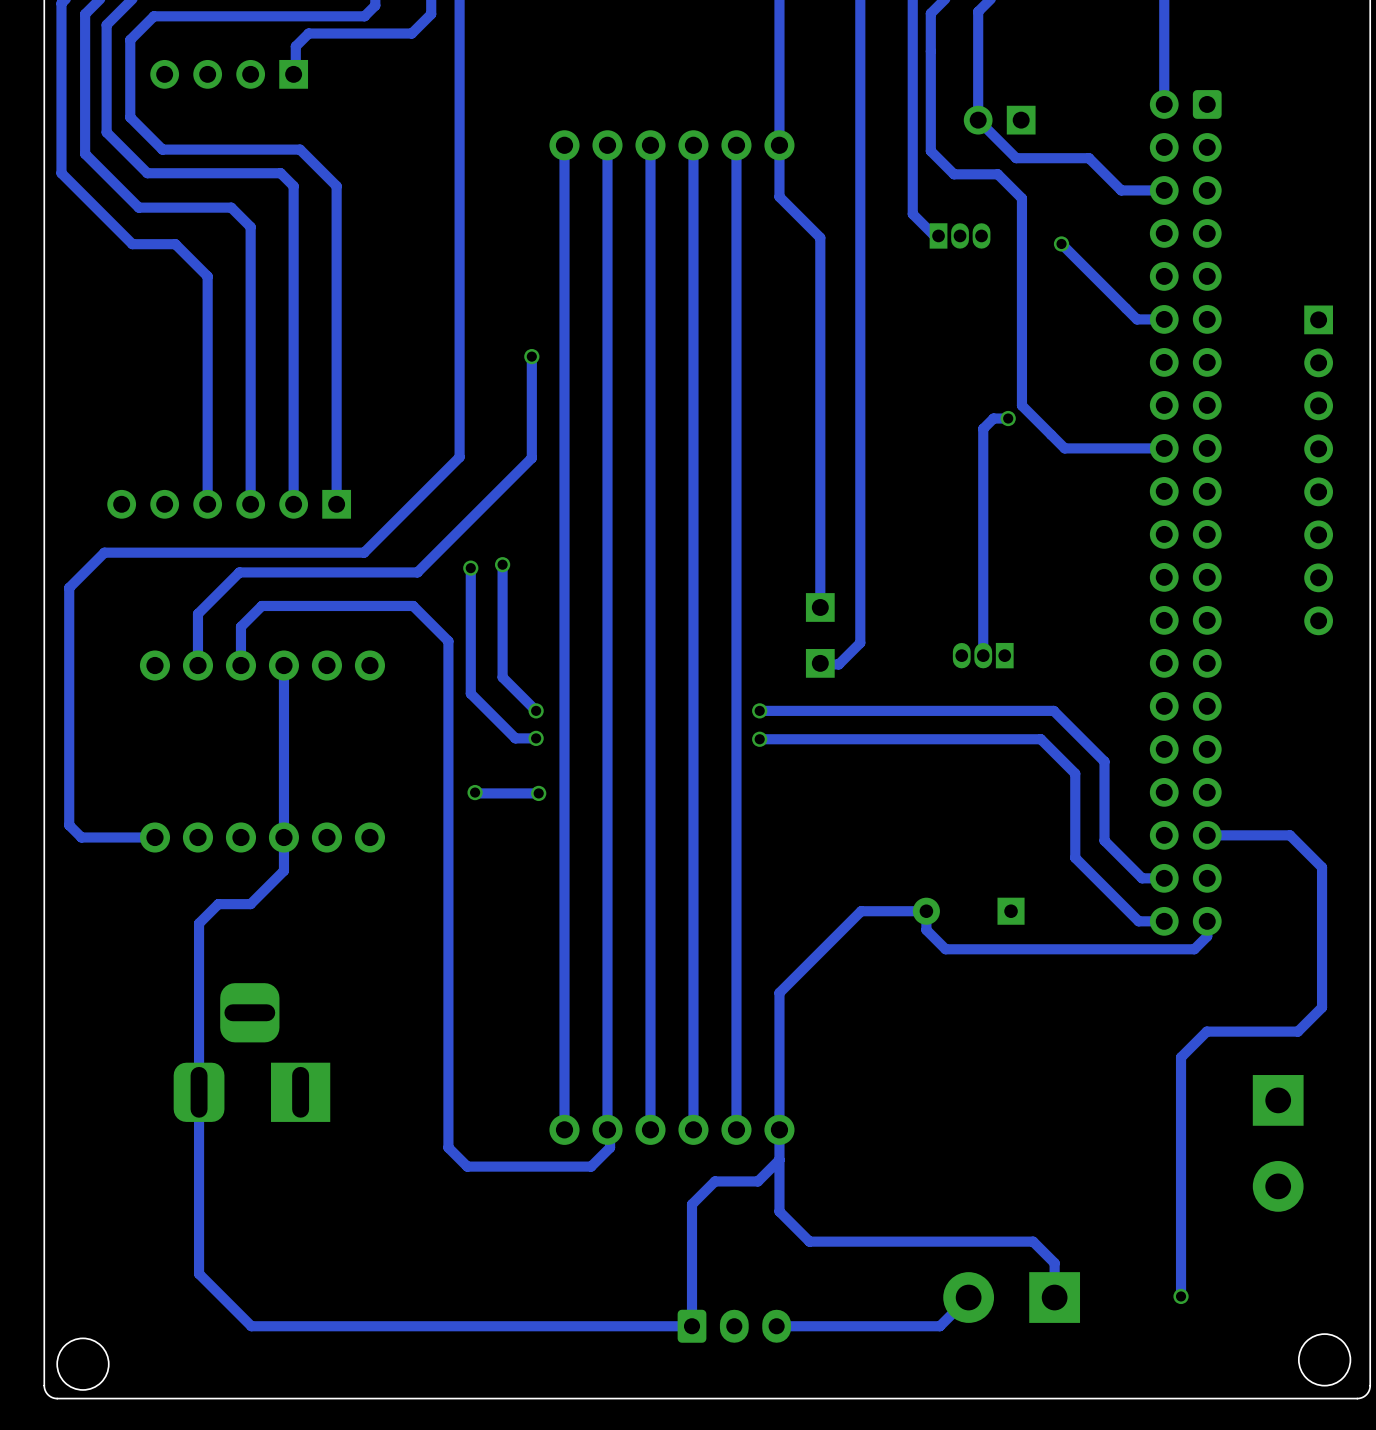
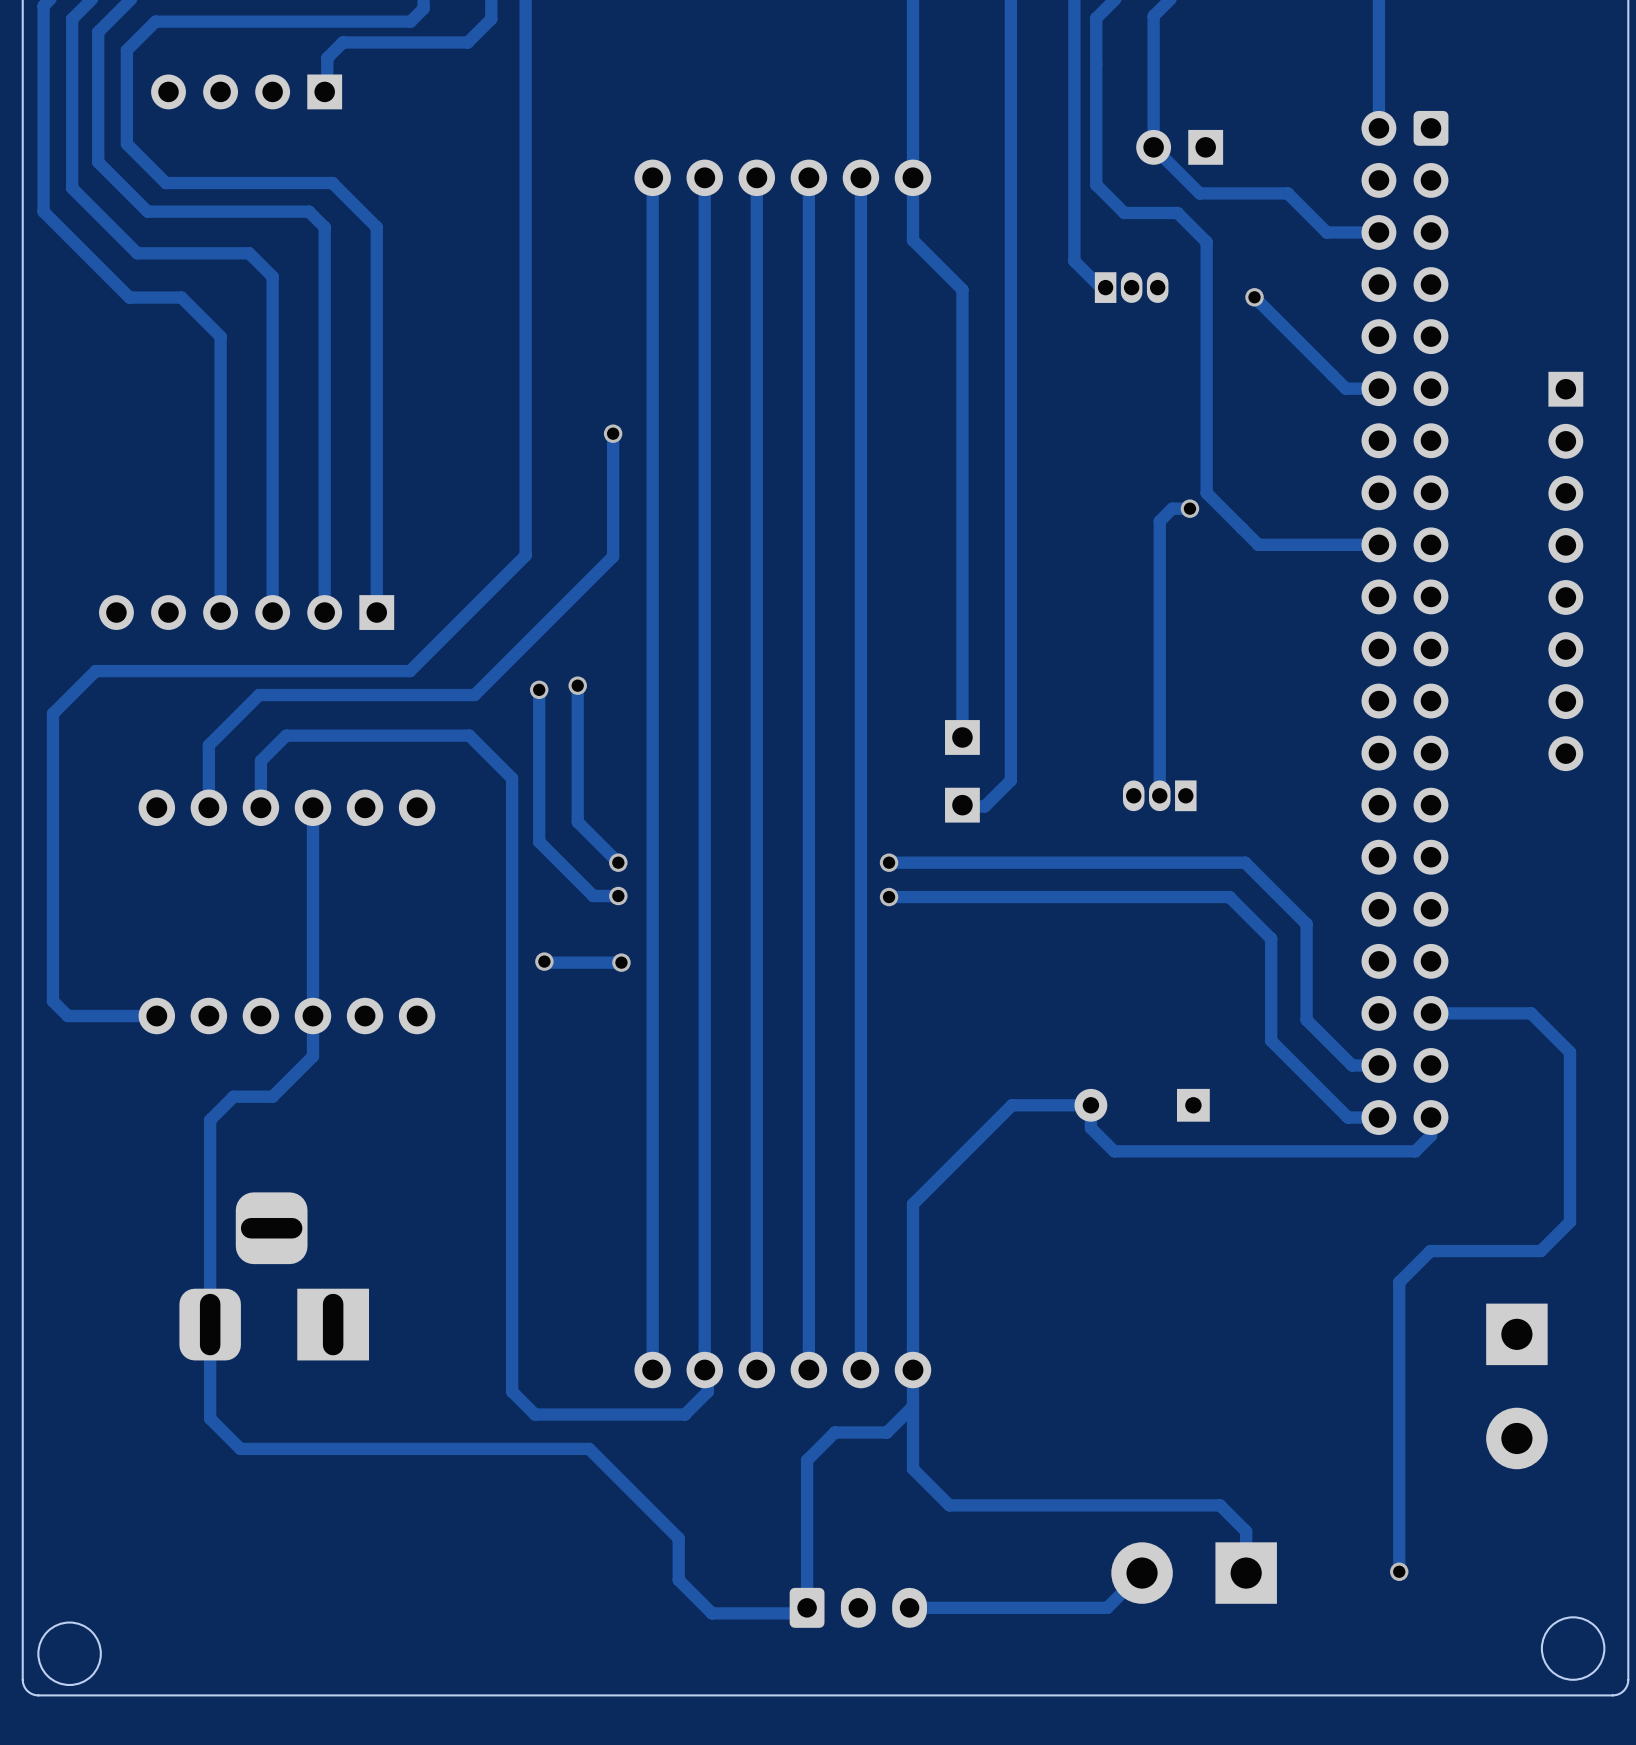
track: (199, 1170) (199, 1273) (251, 1326) (692, 1326) -> (210, 1418) (240, 1448) (589, 1448) (678, 1538) (678, 1580) (712, 1613) (801, 1613) (807, 1607)

